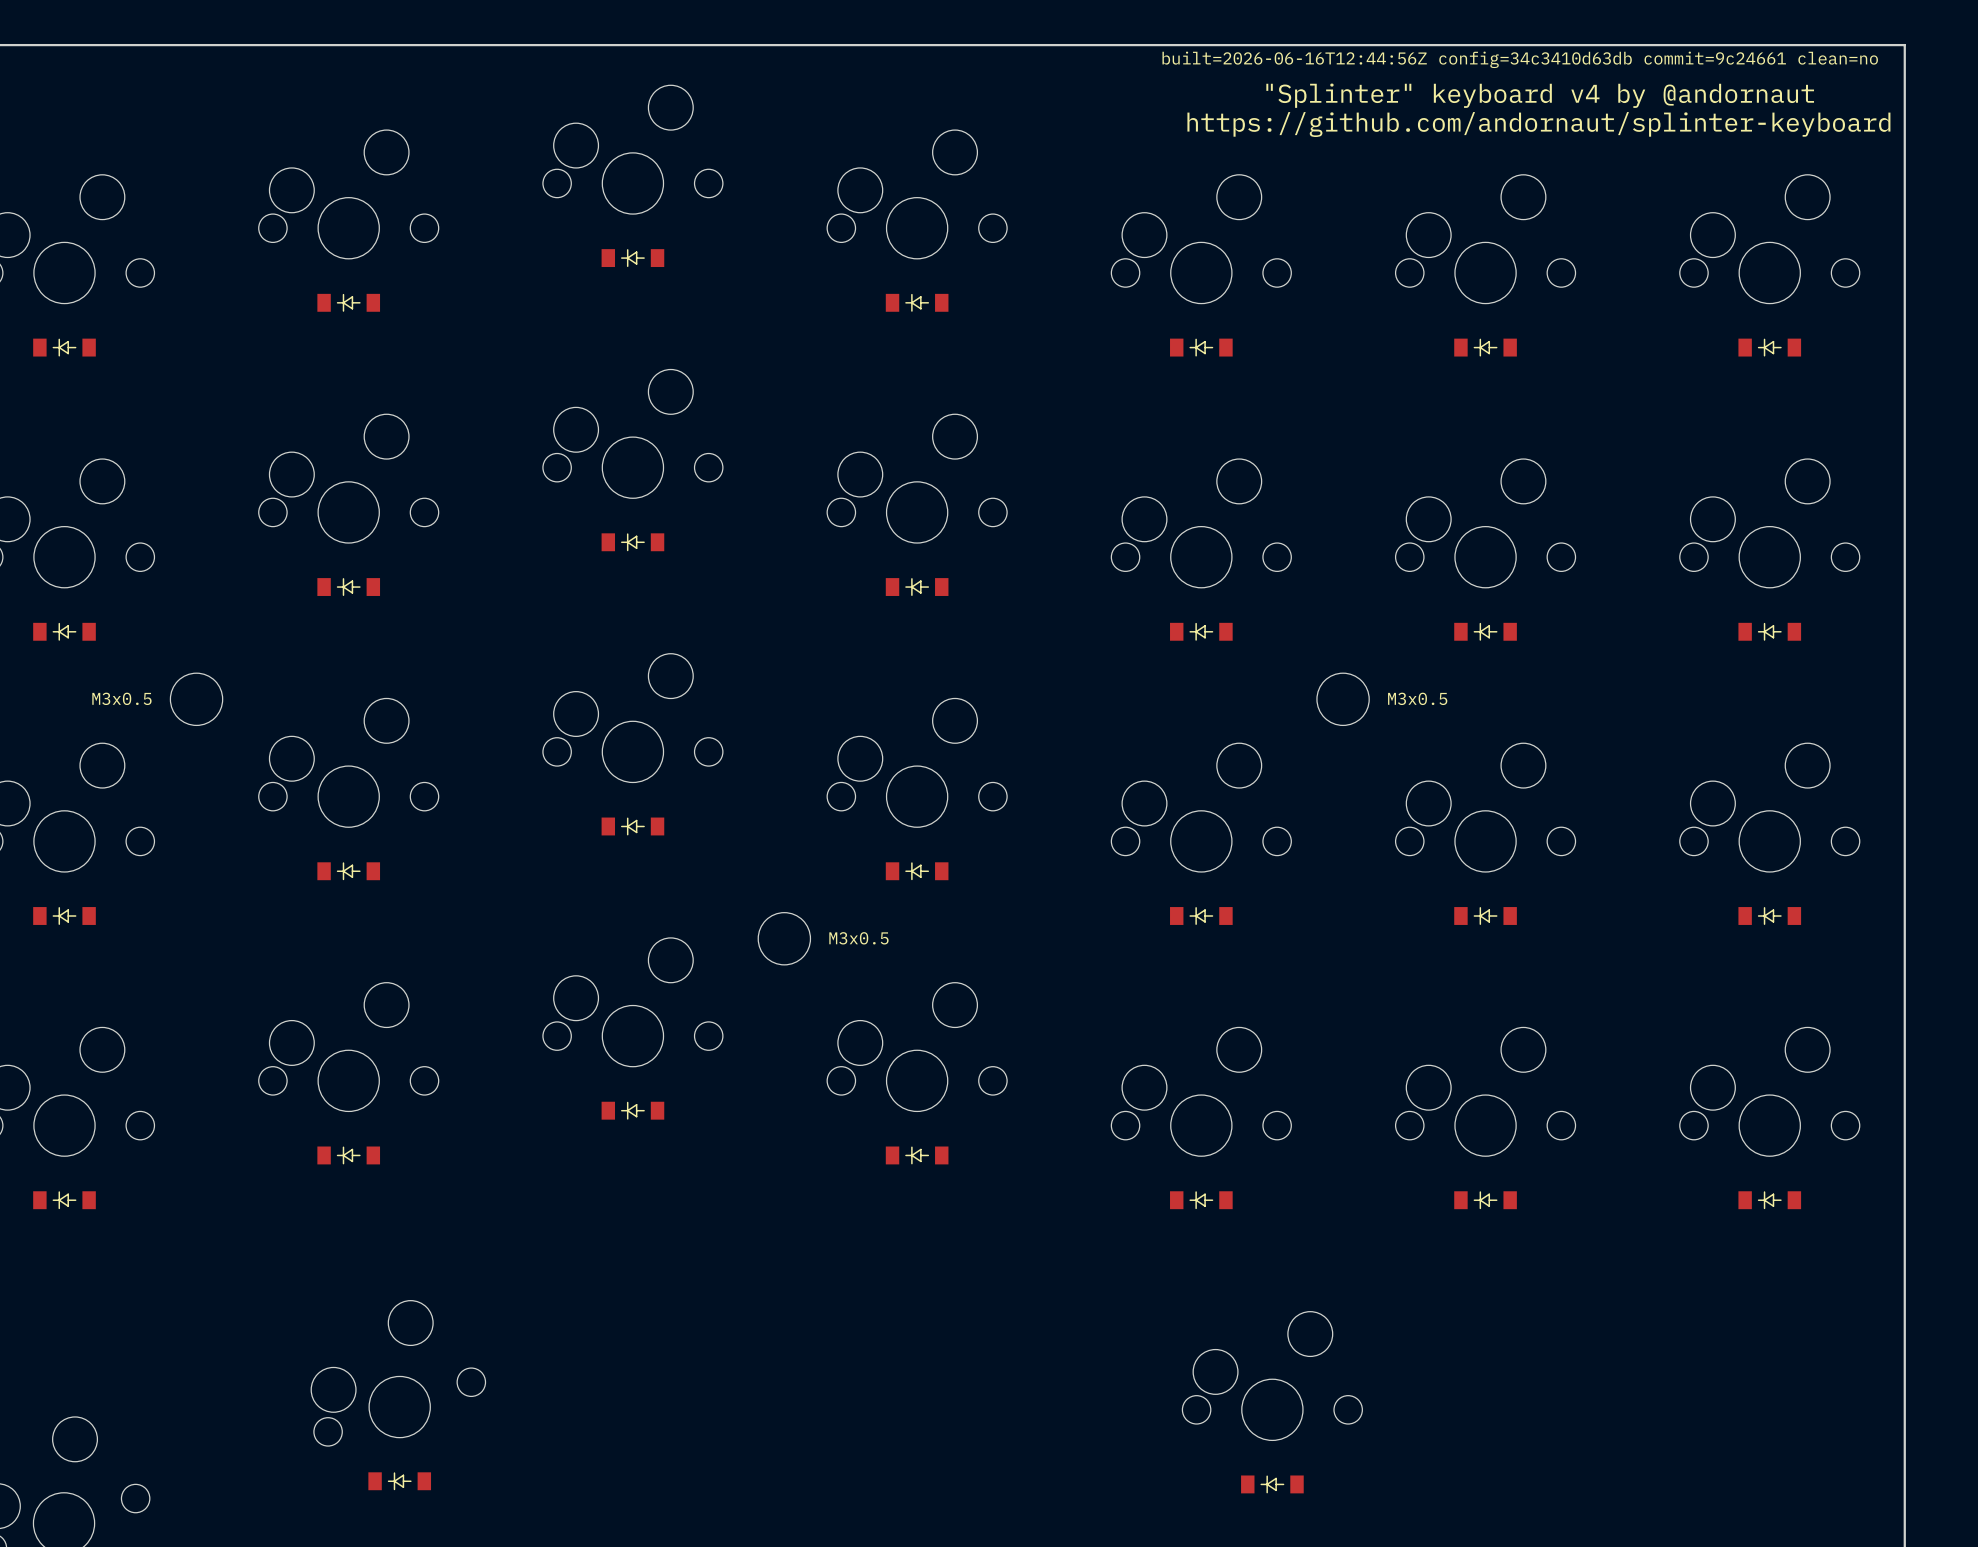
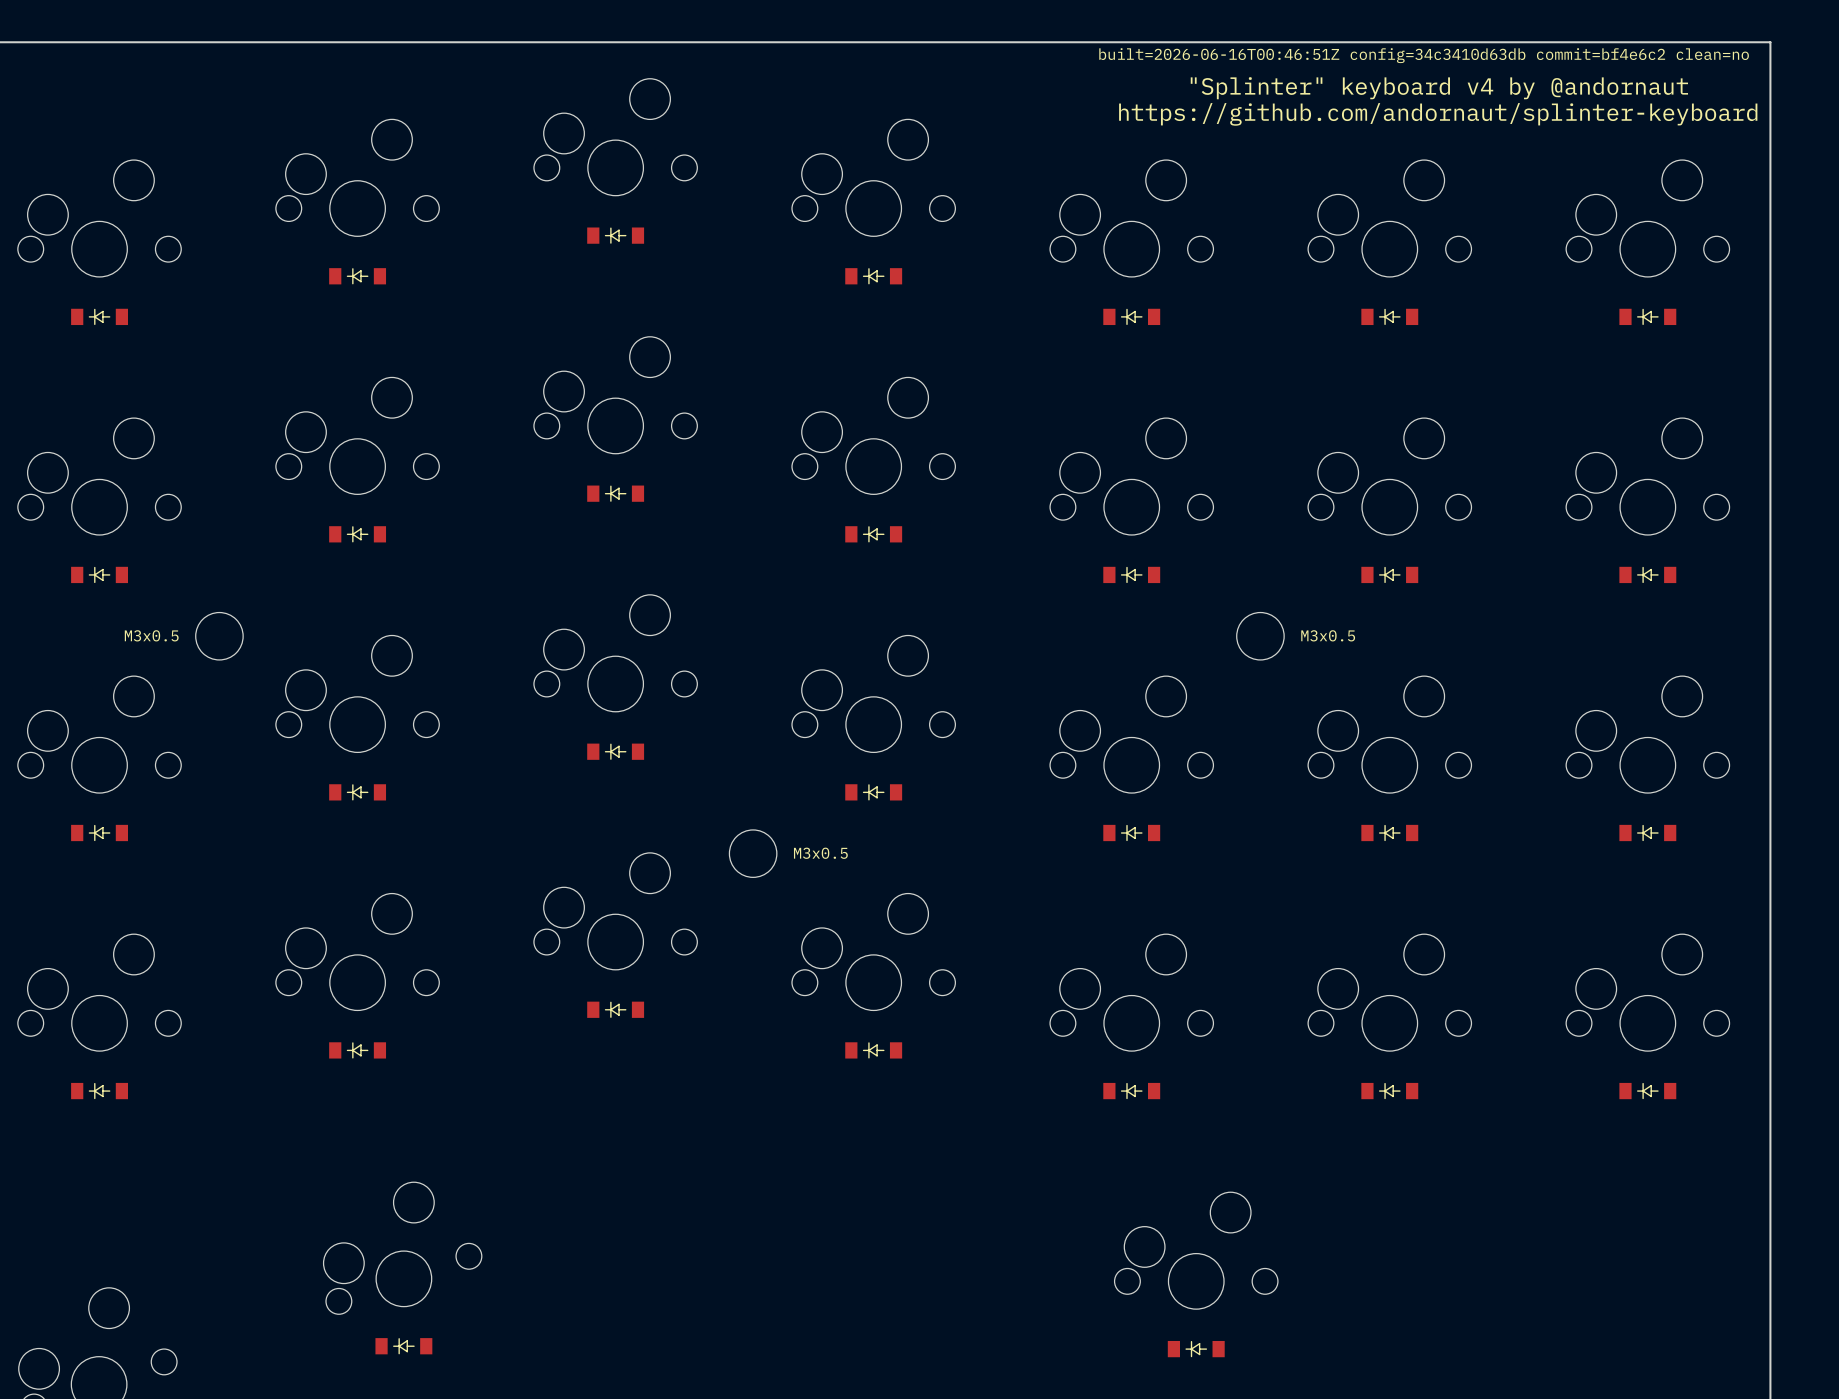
text: built=2026-06-16T12:44:56Z config=34c3410d63db commit=9c24661 clean=no (1520, 59) -> built=2026-06-16T00:46:51Z config=34c3410d63db commit=bf4e6c2 clean=no (1424, 55)

